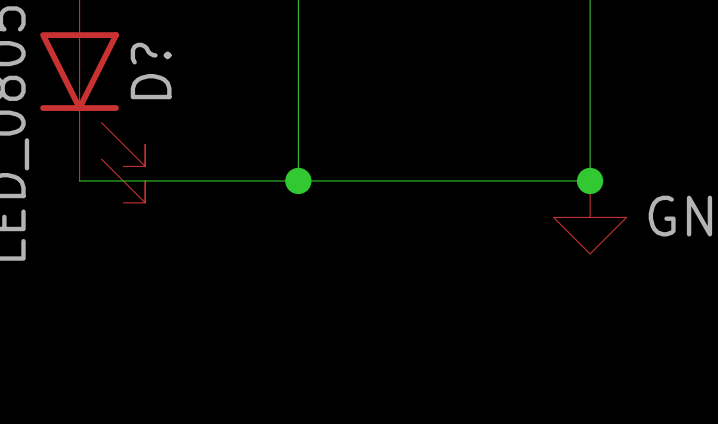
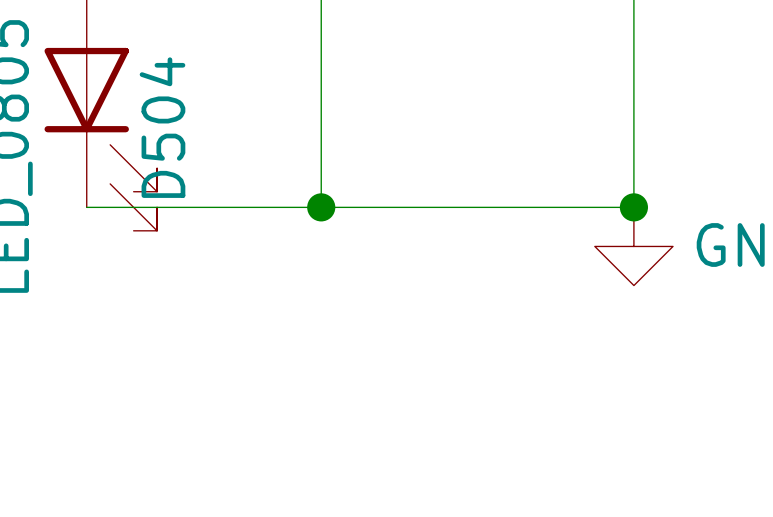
D? name: D? (151, 70) -> D504 (162, 127)

